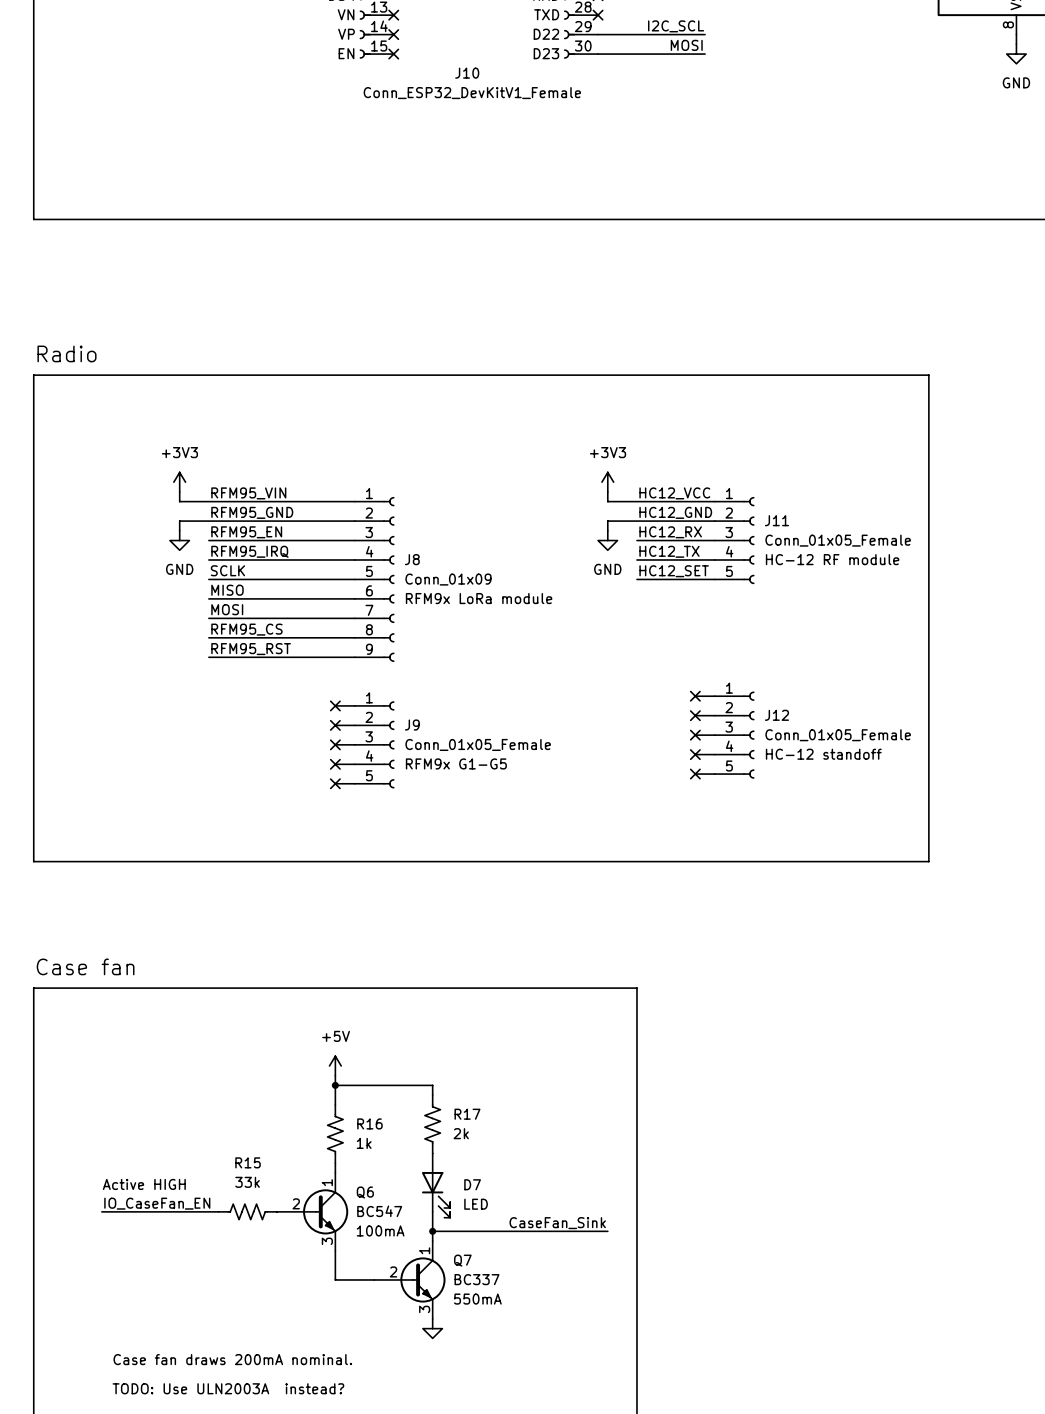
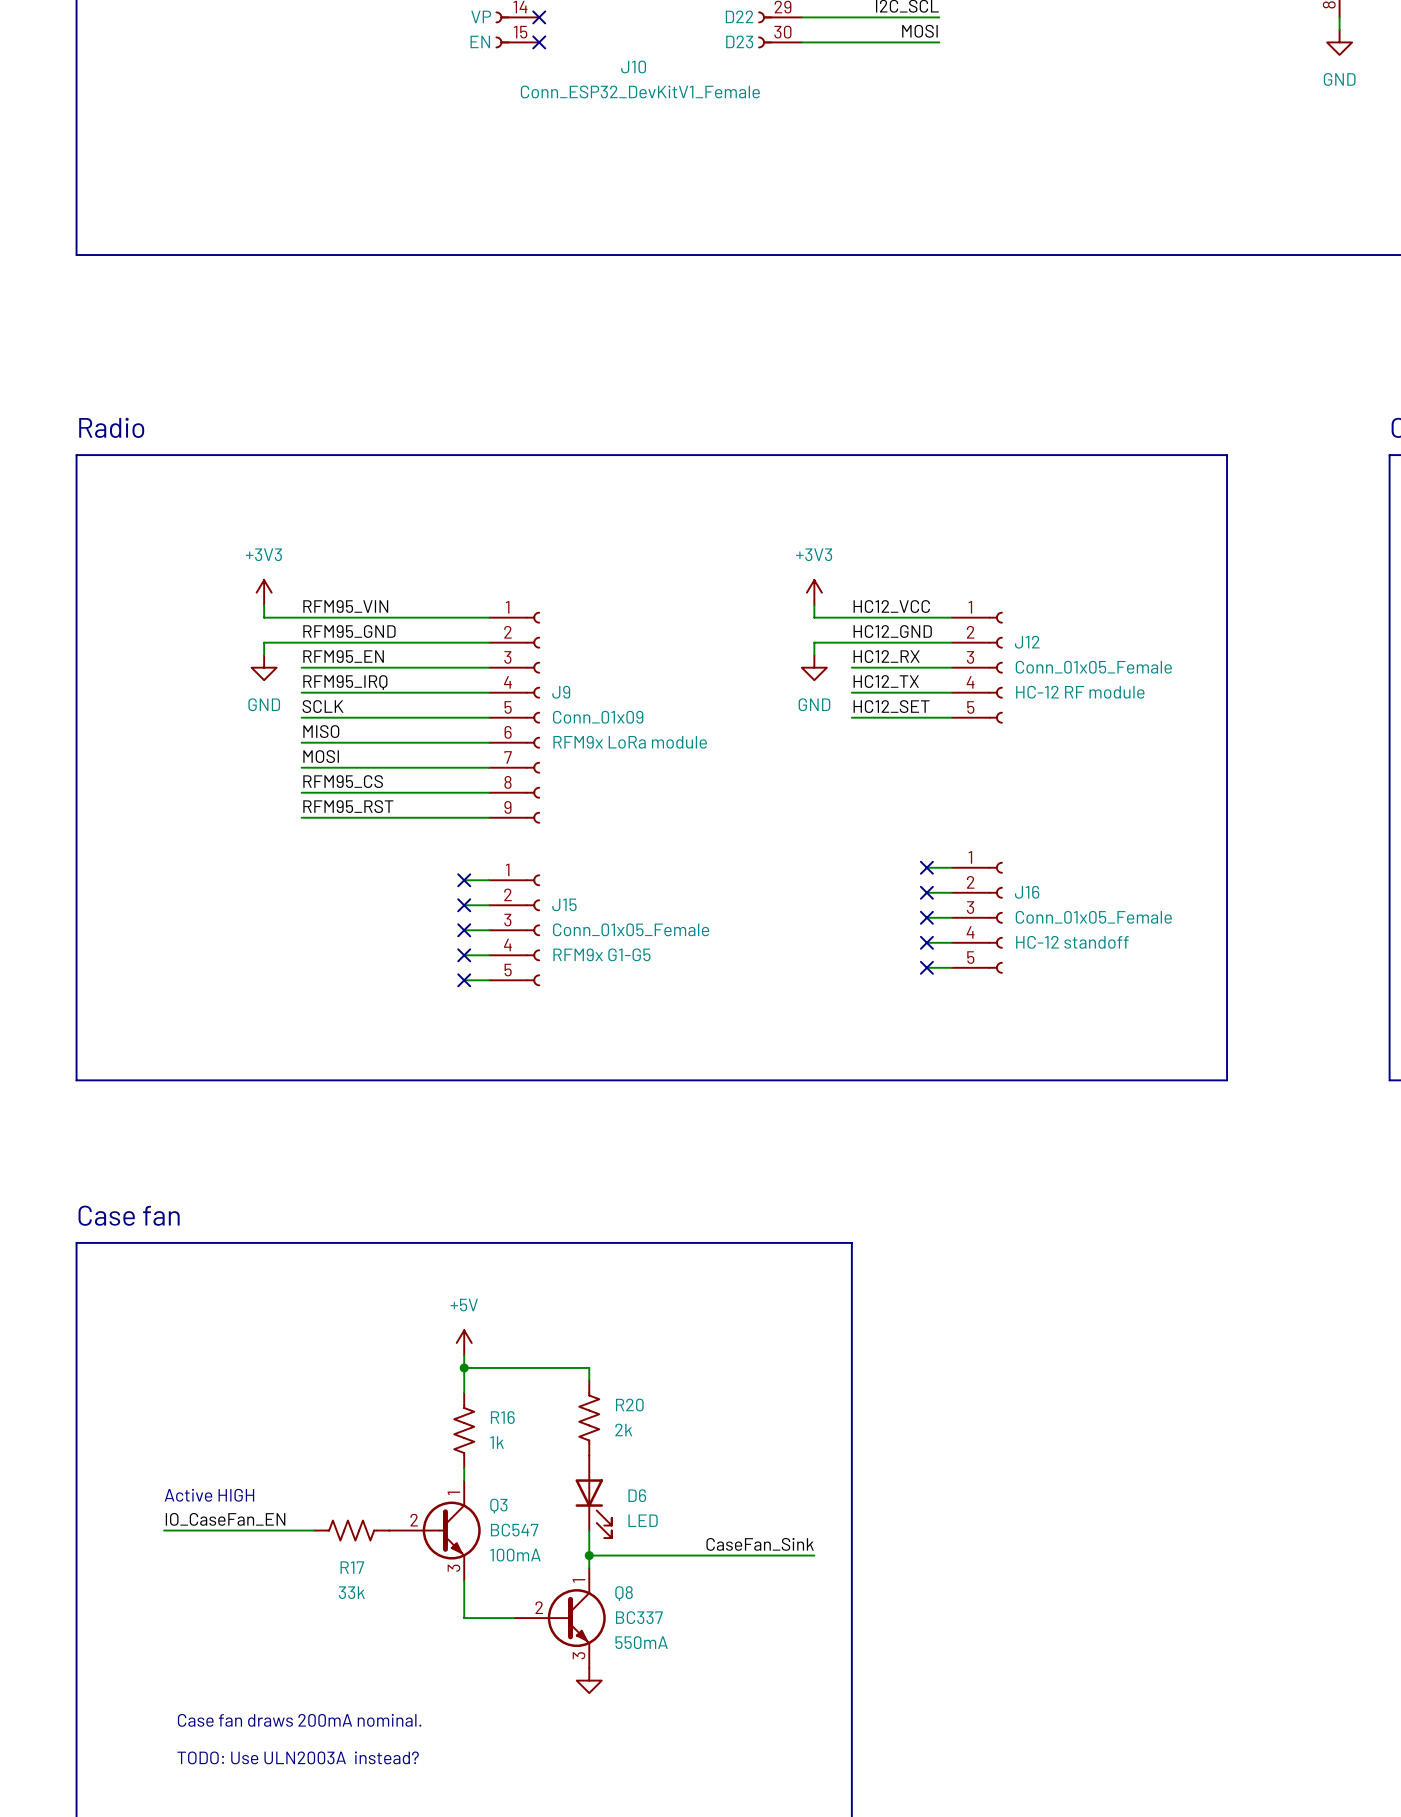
J11 name: J11 (776, 520) -> J12 (1027, 642)
J8 name: J8 (412, 559) -> J9 (561, 692)
J12 name: J12 (776, 715) -> J16 (1027, 892)
J9 name: J9 (412, 725) -> J15 (564, 904)
R17 name: R17 (467, 1114) -> R20 (629, 1405)
R15 name: R15 (248, 1162) -> R17 (352, 1567)
R15 value position: 33k (247, 1182) -> 33k (351, 1592)
D7 name: D7 (472, 1184) -> D6 (637, 1495)
Q6 name: Q6 (365, 1192) -> Q3 (498, 1506)
Q7 name: Q7 (462, 1260) -> Q8 (624, 1593)

